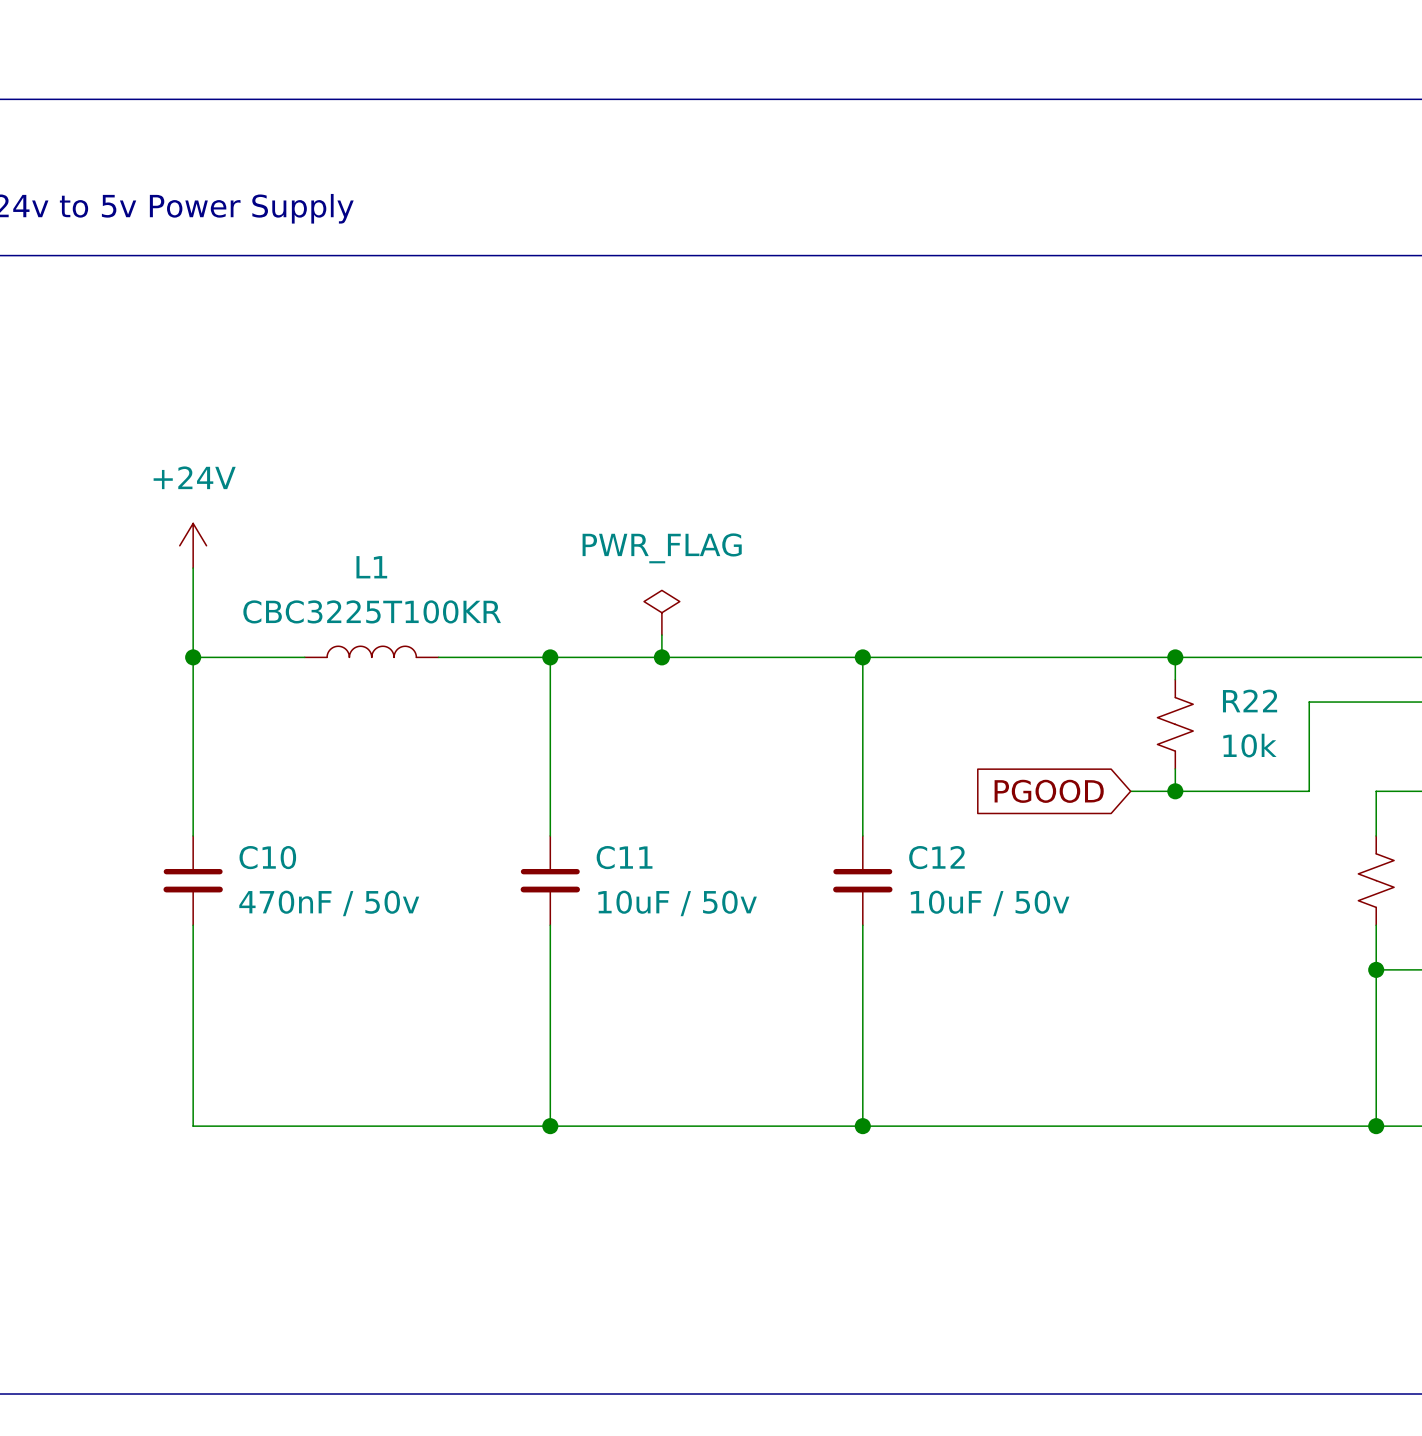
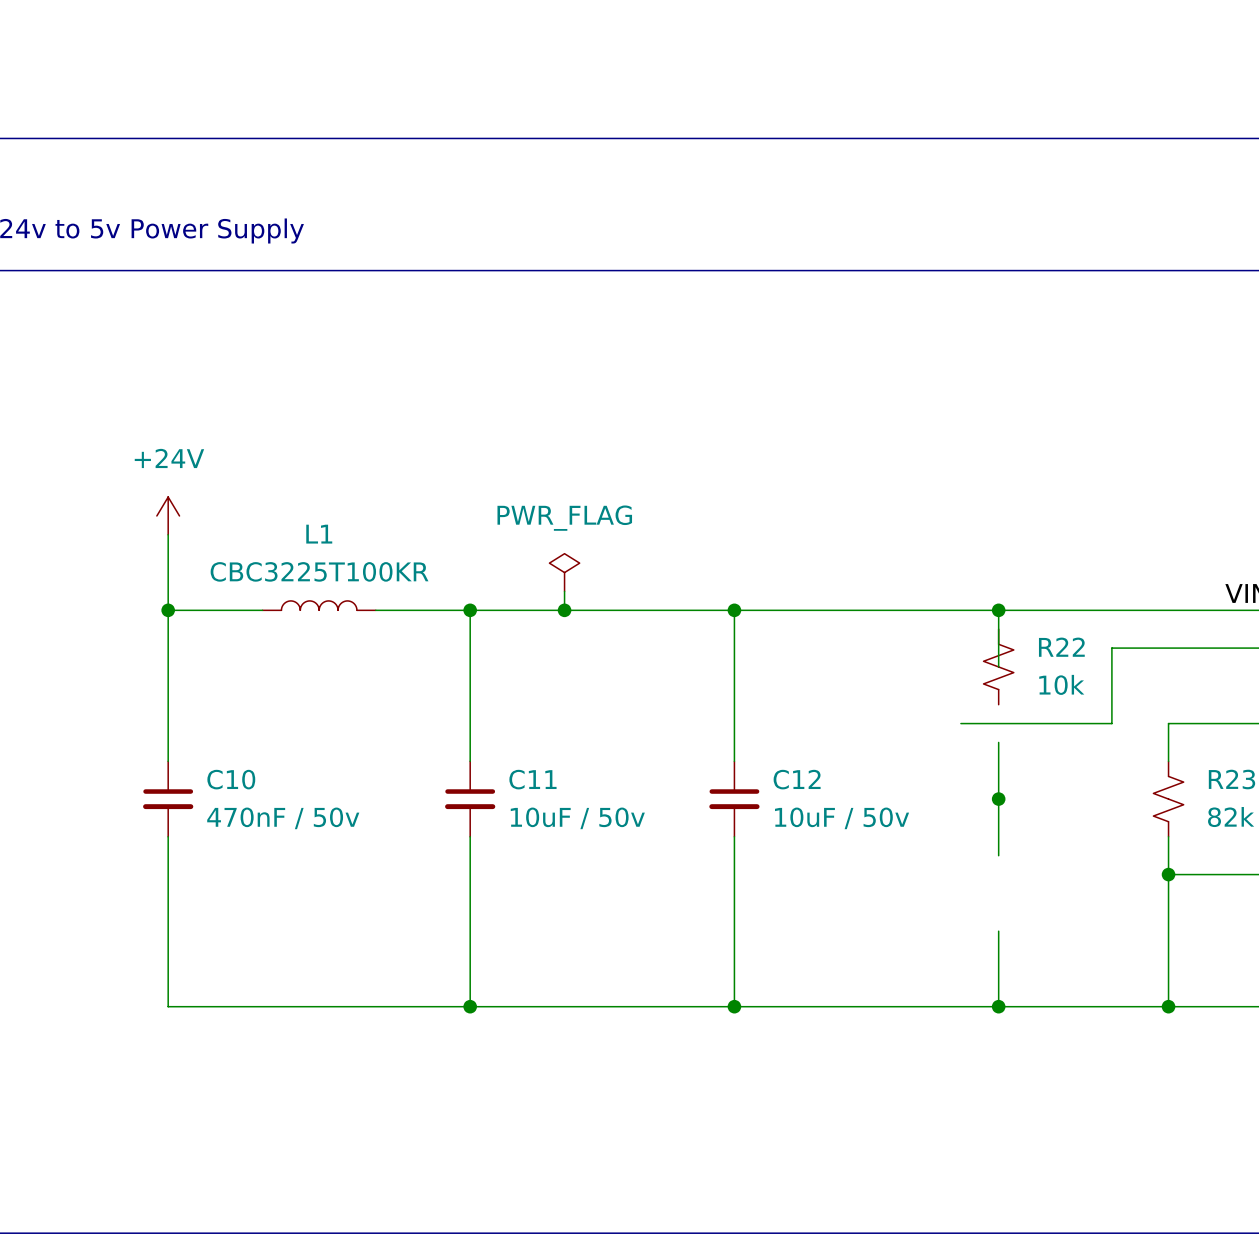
wire: none -> (998, 629) (998, 666)
wire: (1175, 768) (1175, 791) -> none
global label: PGOOD (1049, 791) -> none
junction position: (1175, 791) -> (998, 799)
wire: none -> (998, 742) (998, 855)
wire: none -> (998, 931) (998, 1006)
junction: none -> (998, 1006)

